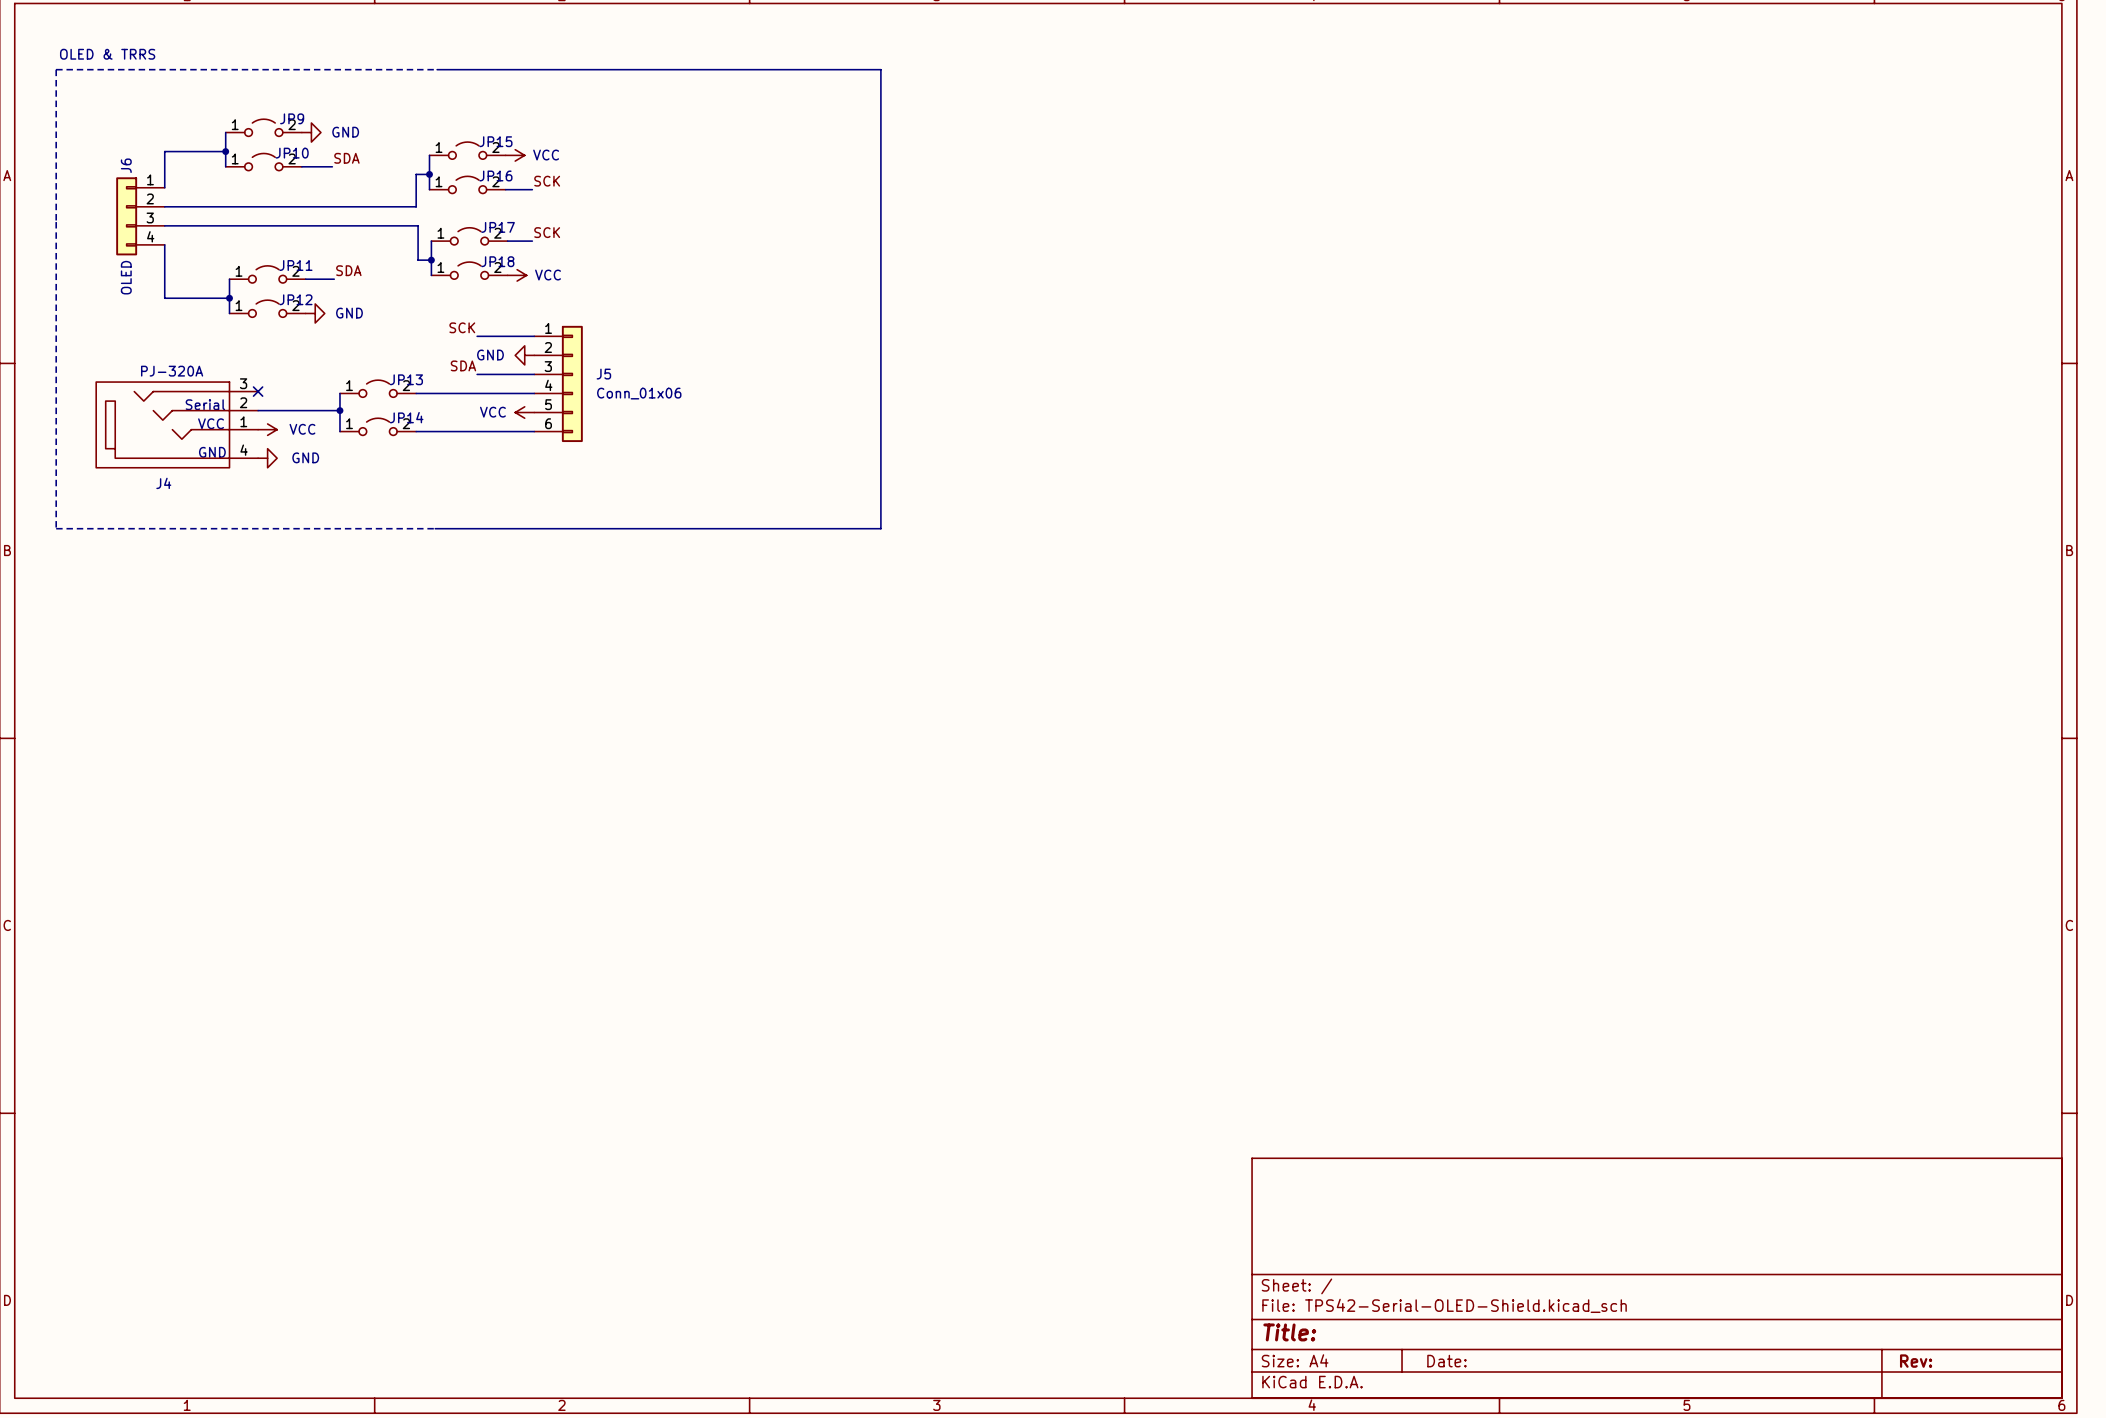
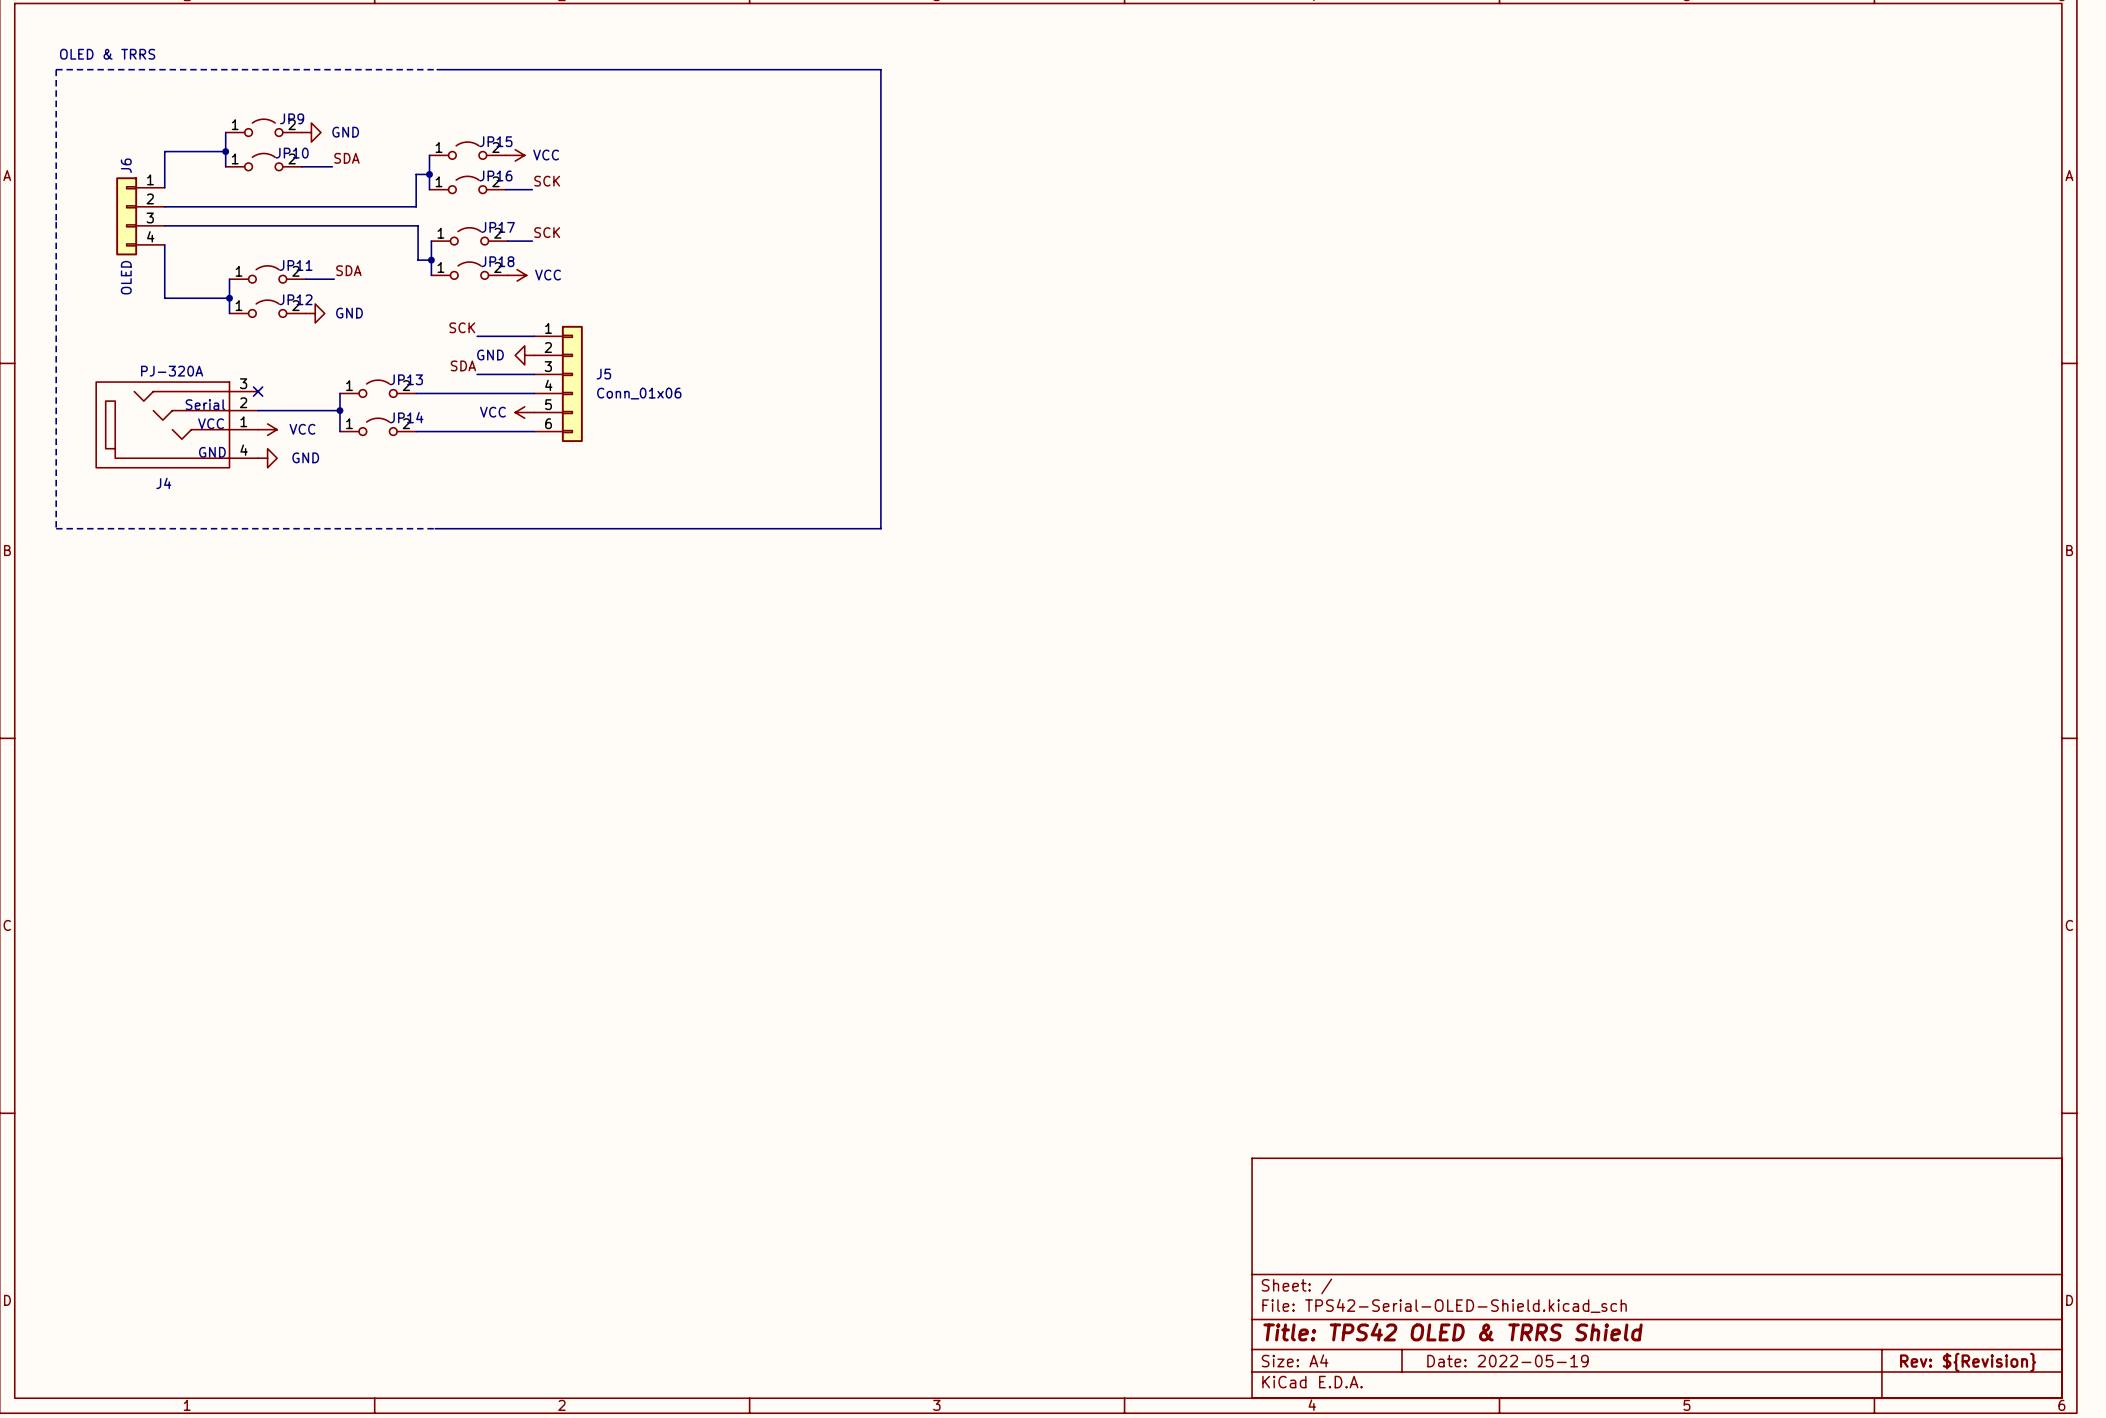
title block: Title: (1289, 1332) -> Title: TPS42 OLED & TRRS Shield (1453, 1332)
title block: Date: (1446, 1361) -> Date: 2022-05-19 (1508, 1361)
title block: Rev: (1916, 1361) -> Rev: ${Revision} (1968, 1362)

